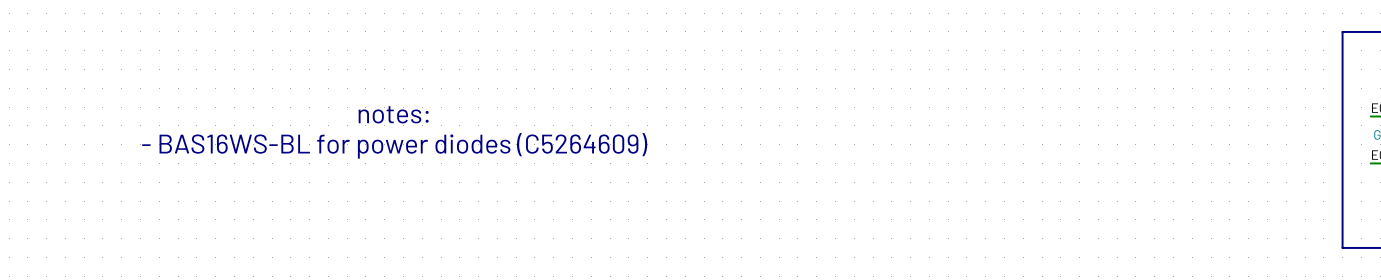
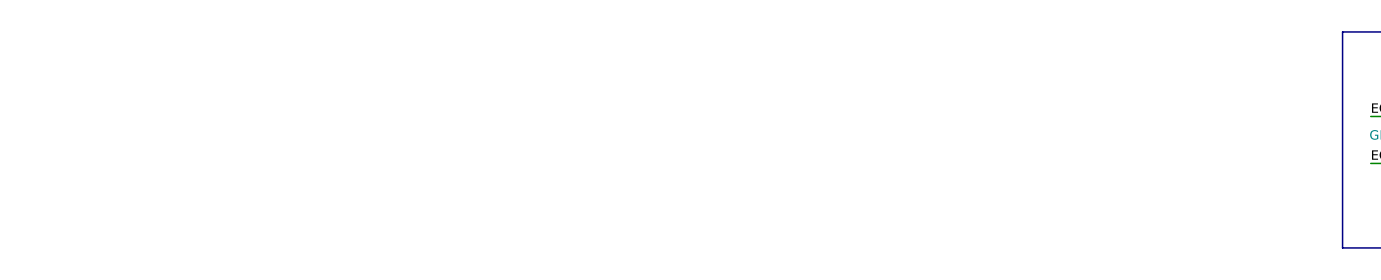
text: notes: (393, 114) -> none
text: - BAS16WS-BL for power diodes (C5264609) (394, 145) -> none

